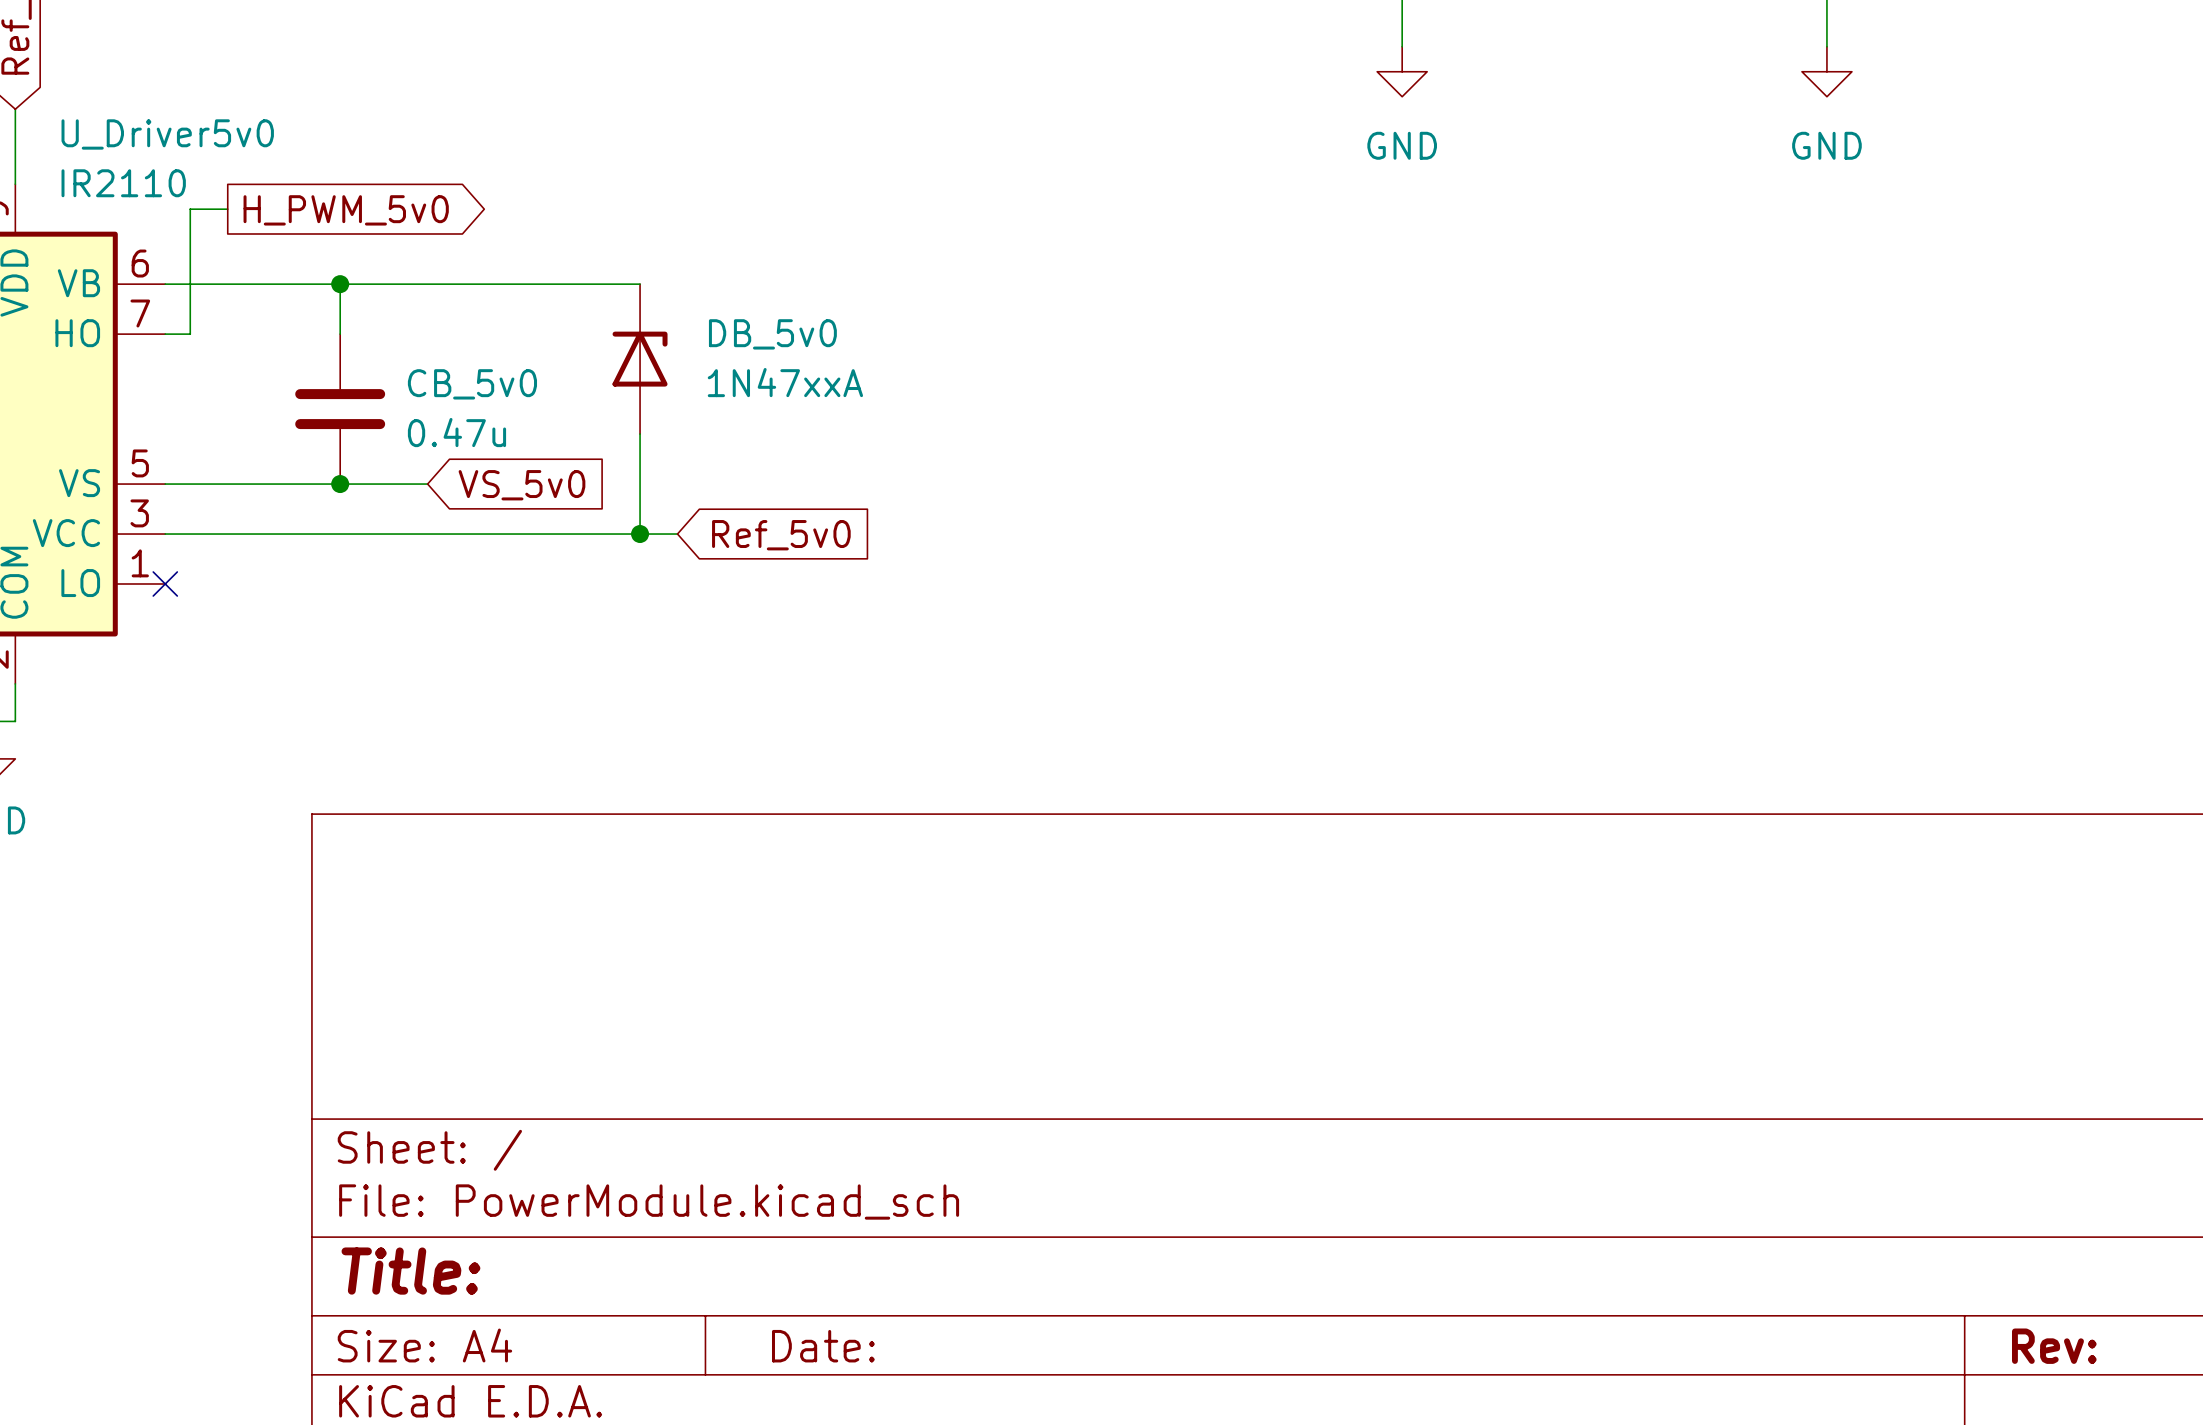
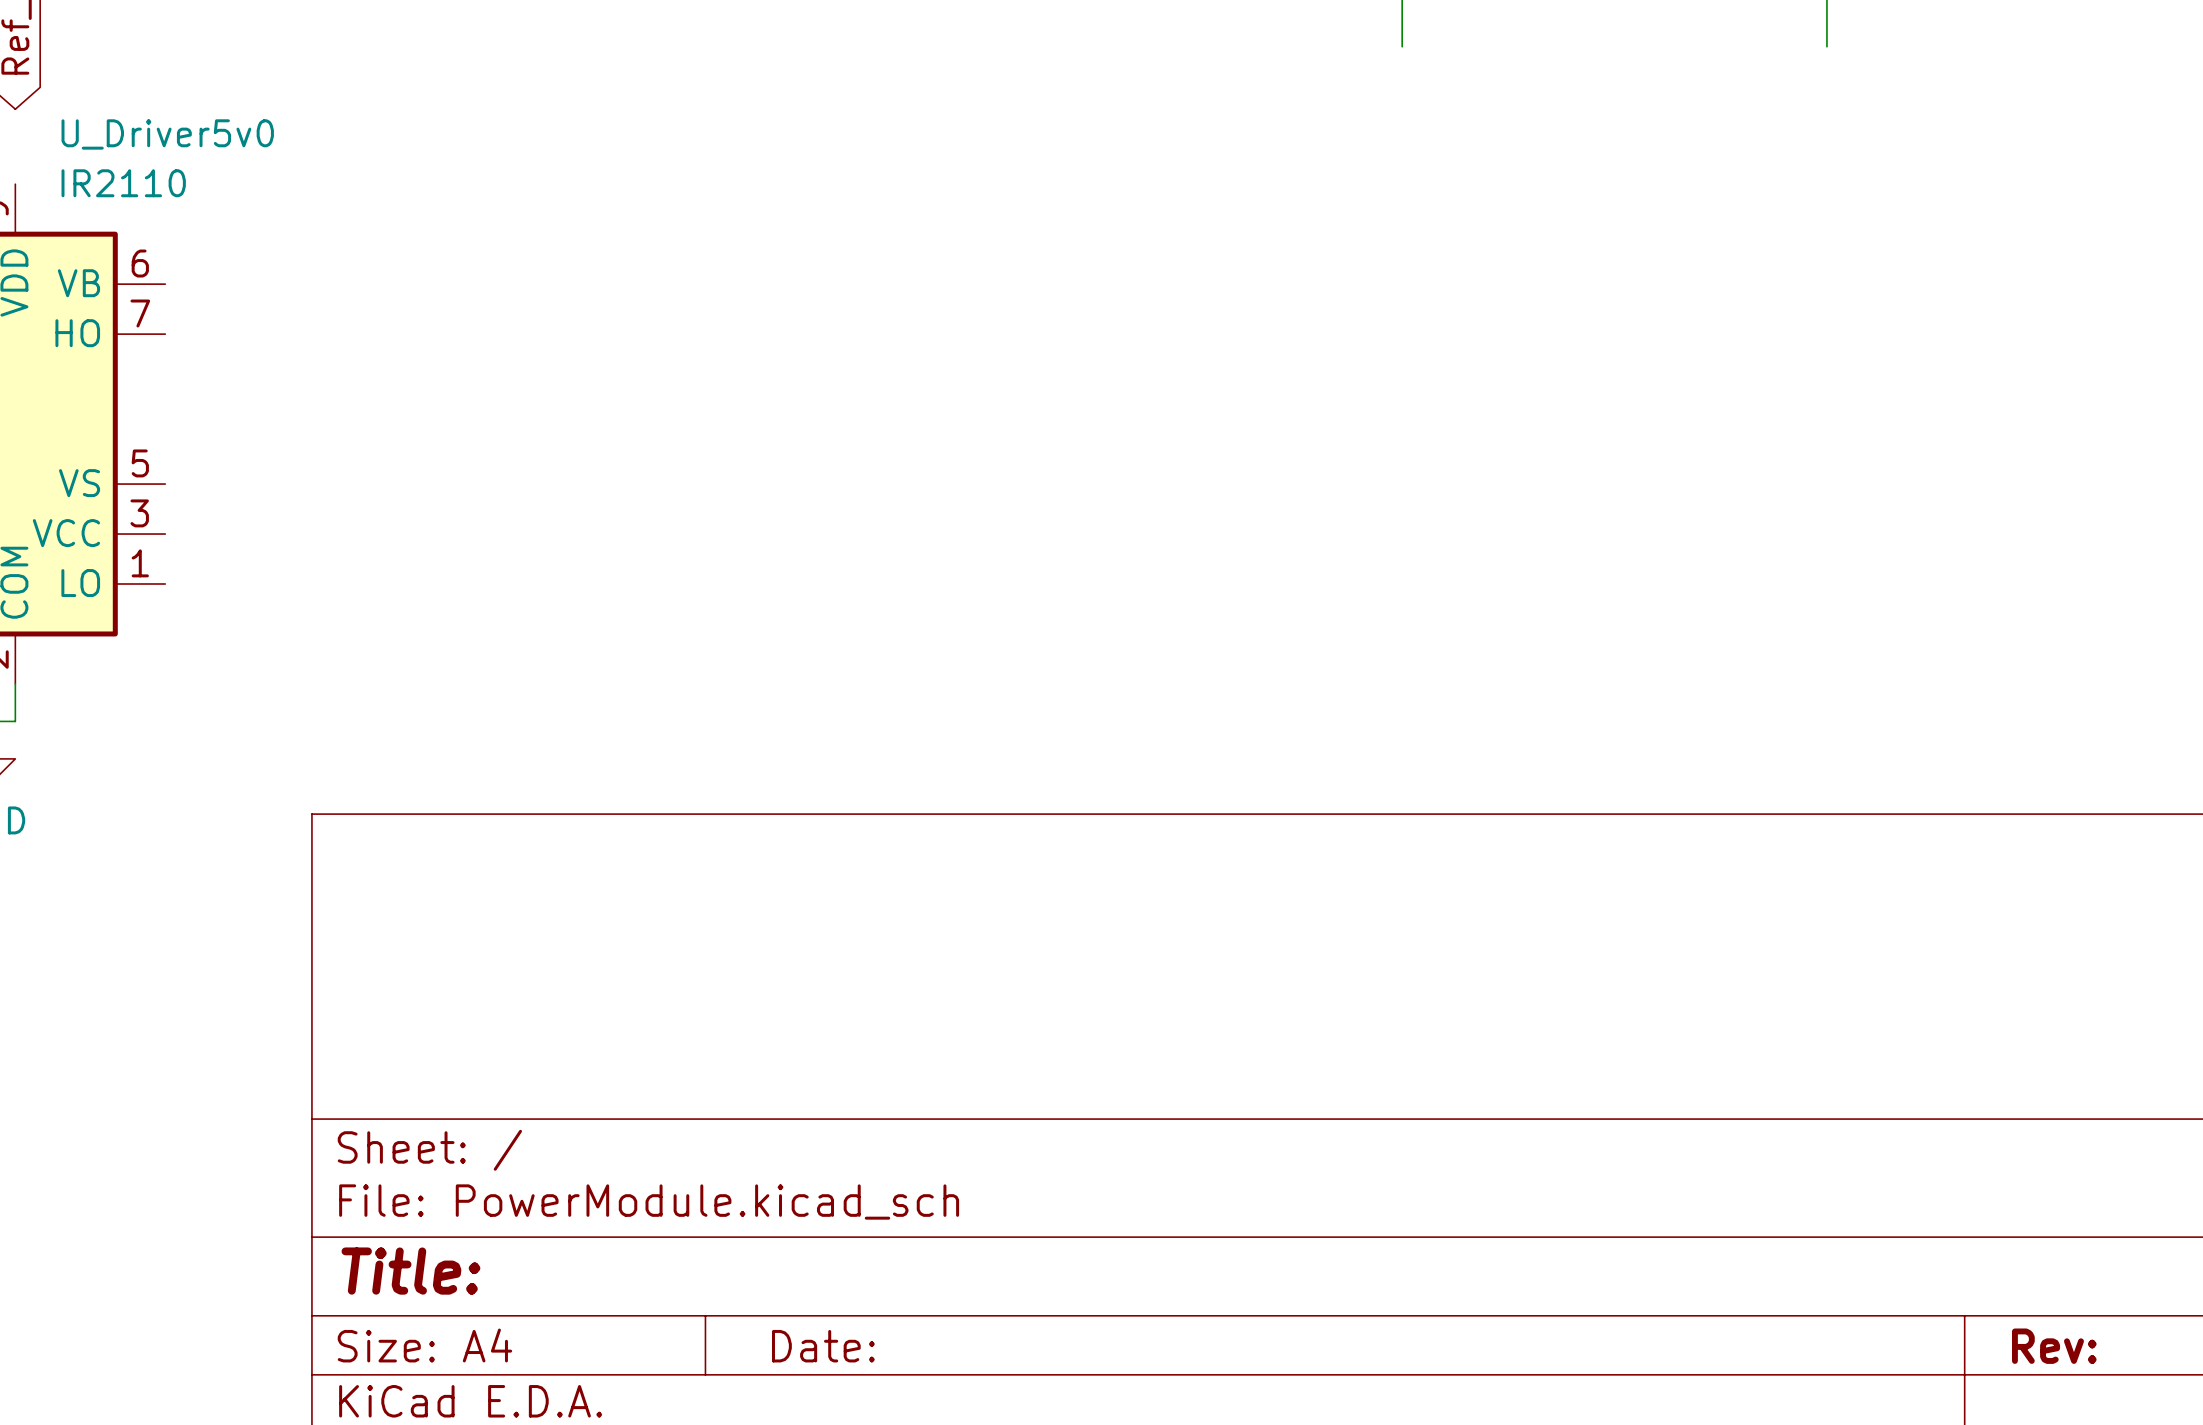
power symbol: GND (1402, 71) -> none
power symbol: GND (1826, 71) -> none
wire: (15, 109) (15, 184) -> none
wire: (227, 209) (190, 209) (190, 334) (165, 334) -> none
global label: H_PWM_5v0 (346, 210) -> none
wire: (165, 284) (640, 284) -> none
wire: (340, 284) (340, 334) -> none
junction: (340, 284) -> none
DB_5v0: 1N47xxA (640, 359) -> none
CB_5v0: 0.47u (340, 409) -> none
wire: (640, 434) (640, 534) -> none
wire: (165, 484) (427, 484) -> none
junction: (340, 484) -> none
global label: VS_5v0 (521, 485) -> none
wire: (165, 534) (677, 534) -> none
junction: (640, 534) -> none
global label: Ref_5v0 (781, 535) -> none
no-connect mark: (165, 583) -> none

